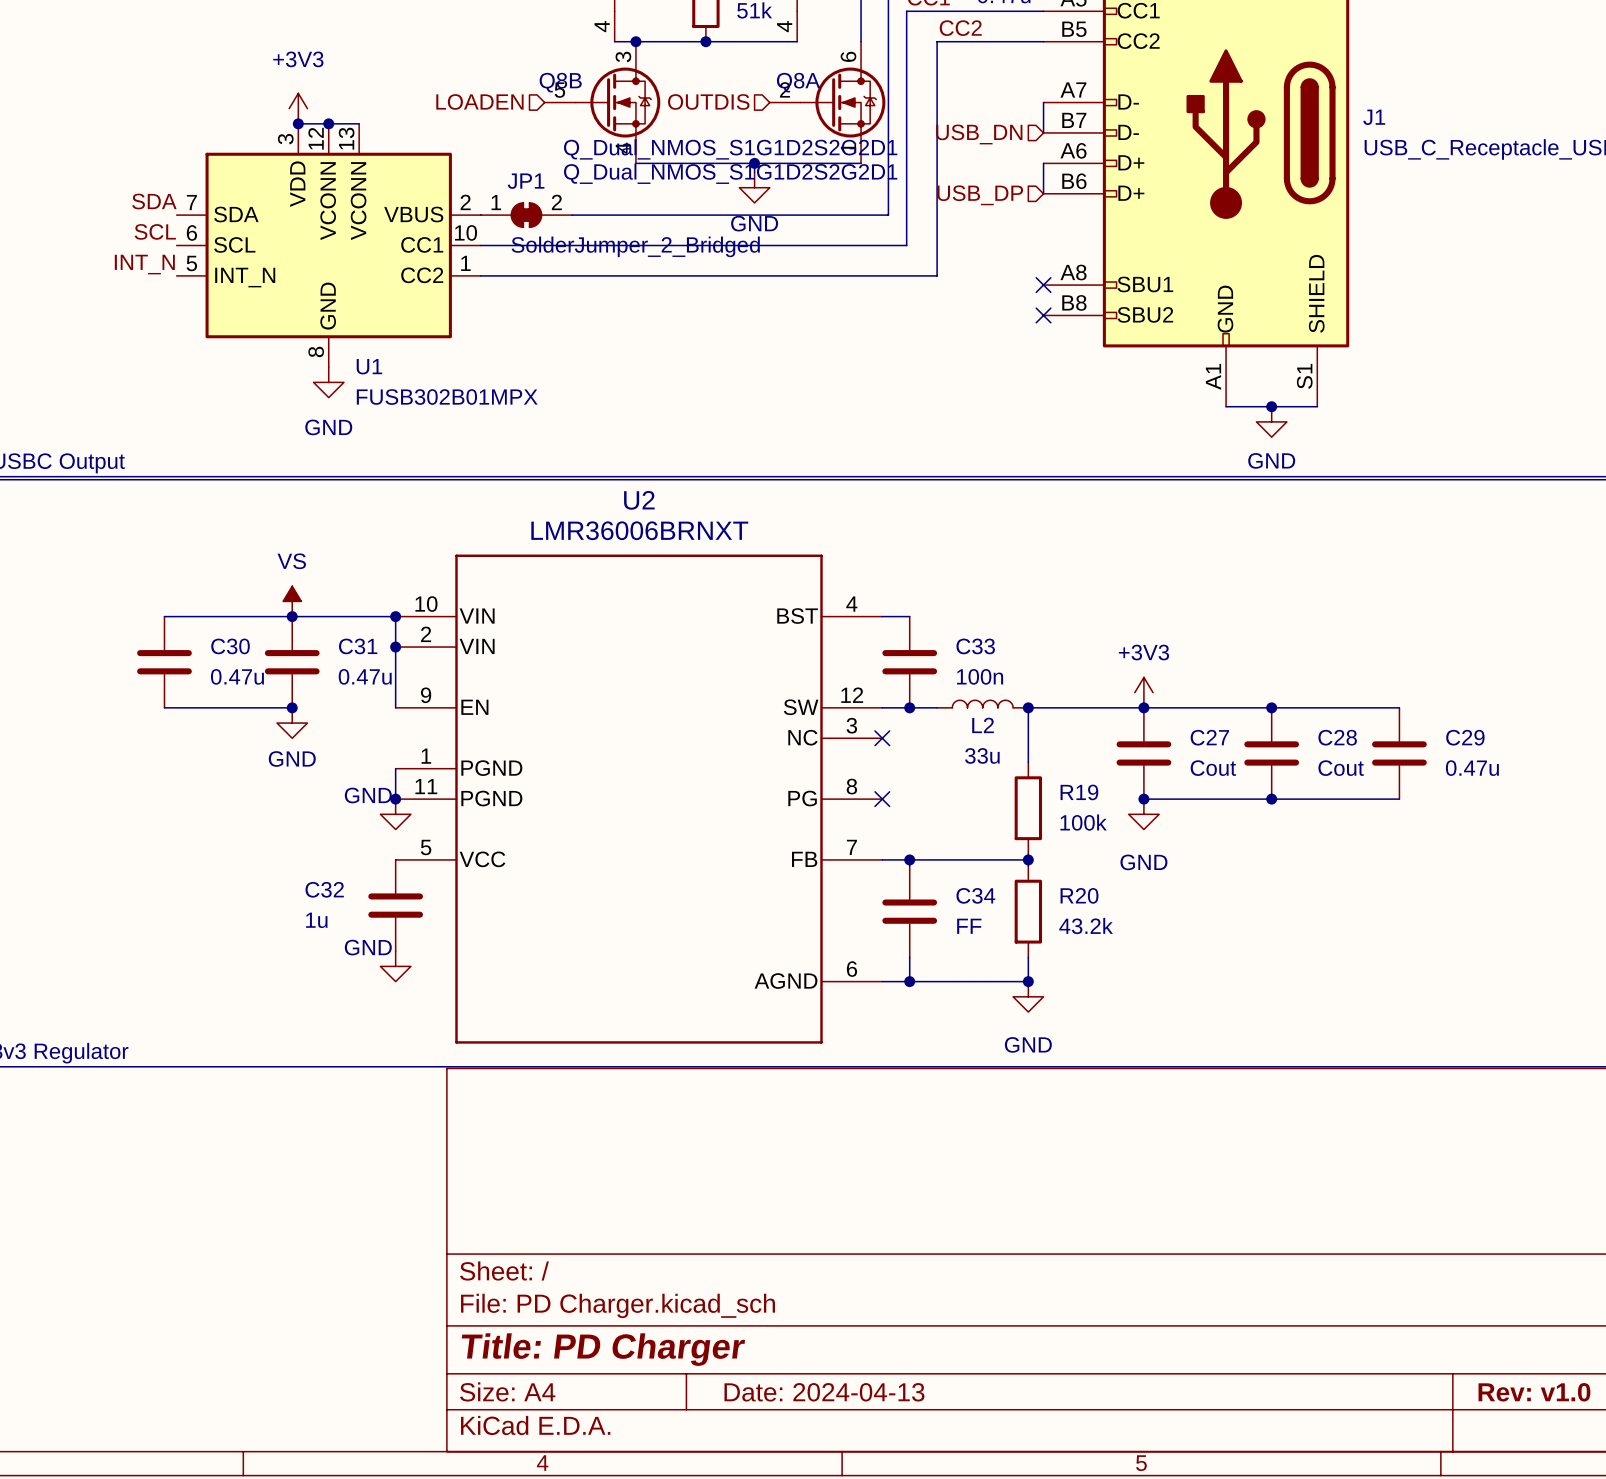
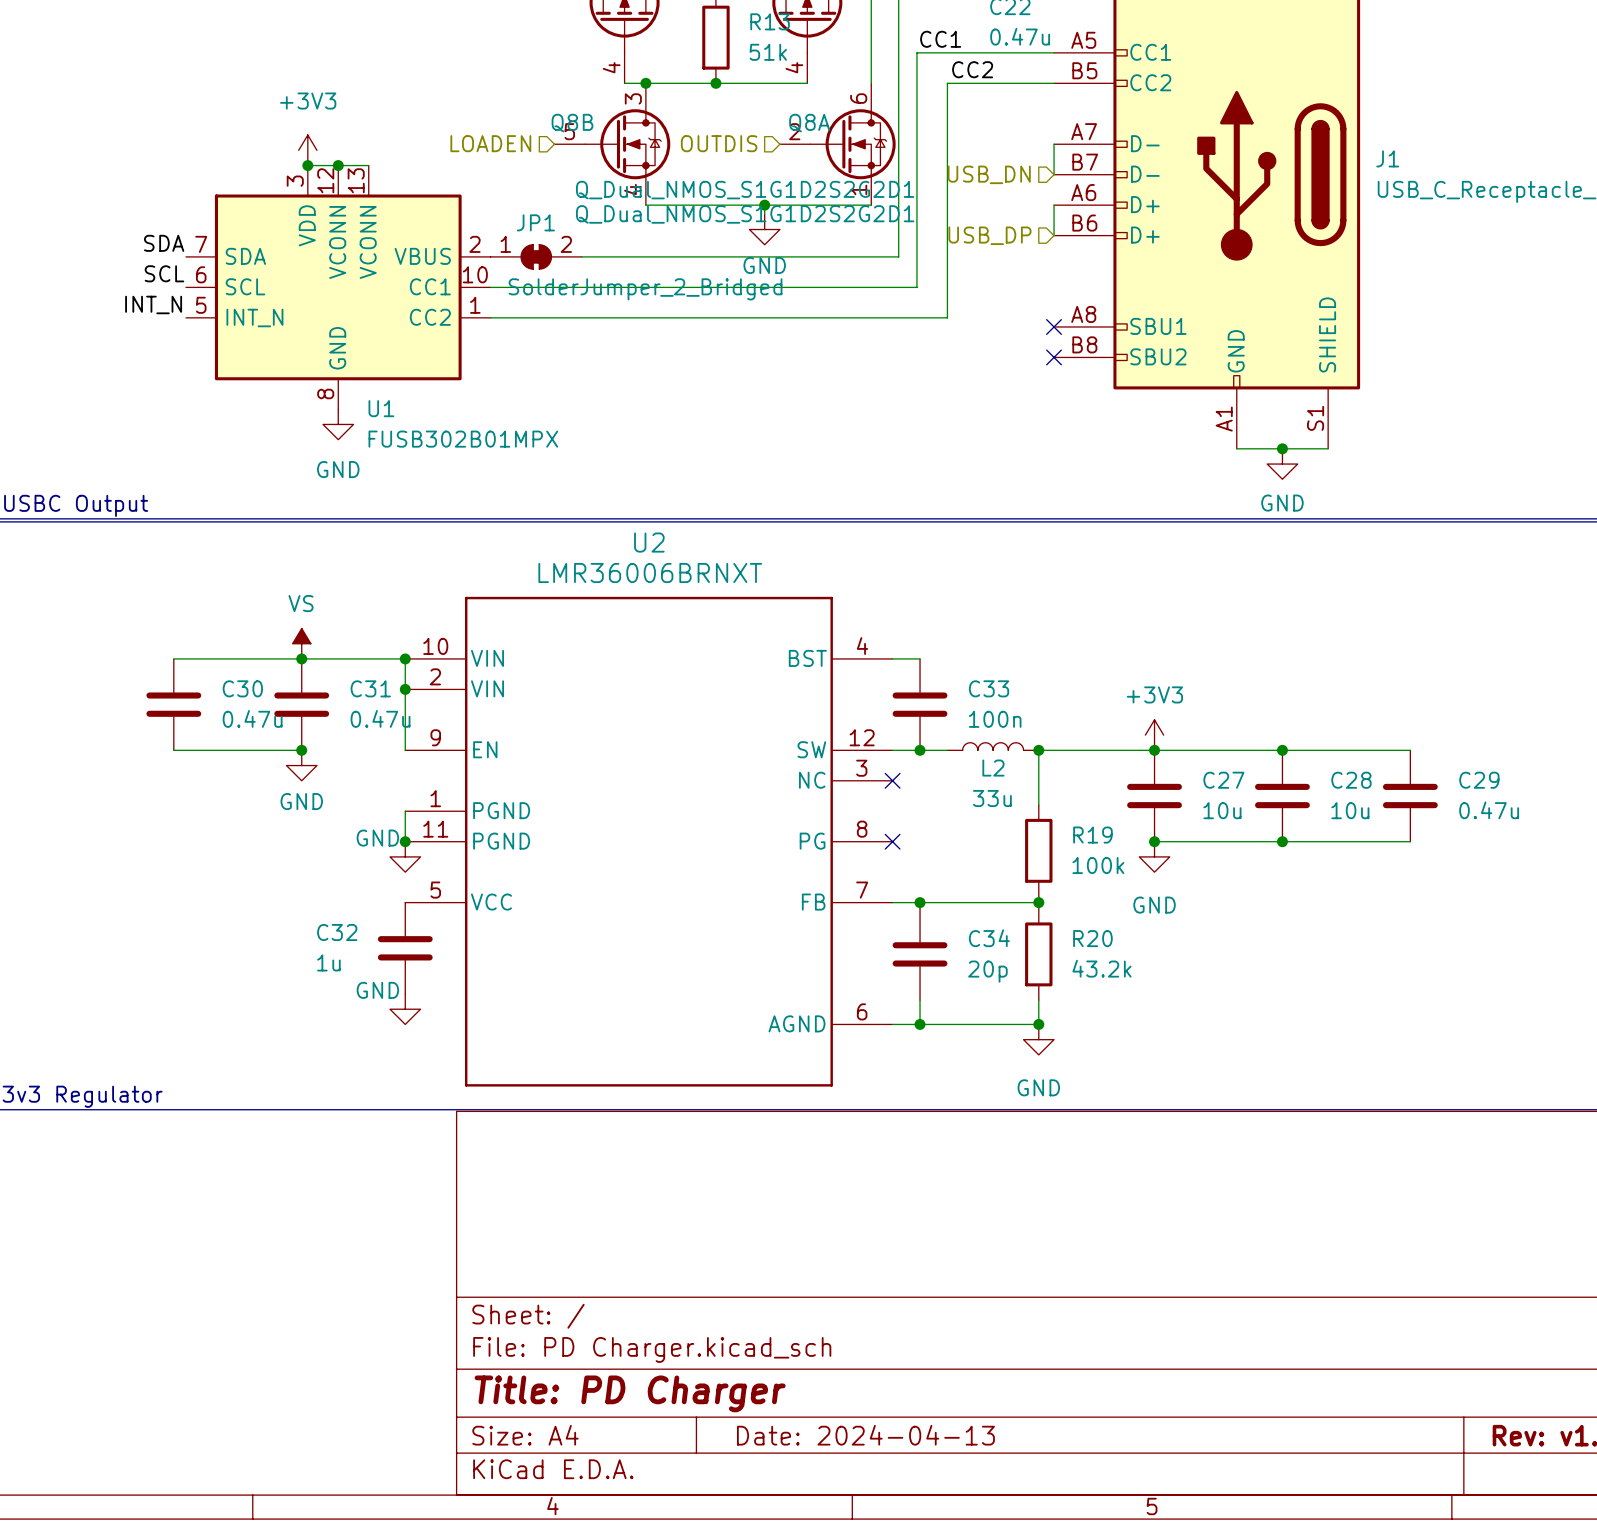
C27 value: Cout (1213, 768) -> 10u (1222, 810)
C28 value: Cout (1341, 768) -> 10u (1350, 810)
C34 value: FF (969, 926) -> 20p (987, 971)

